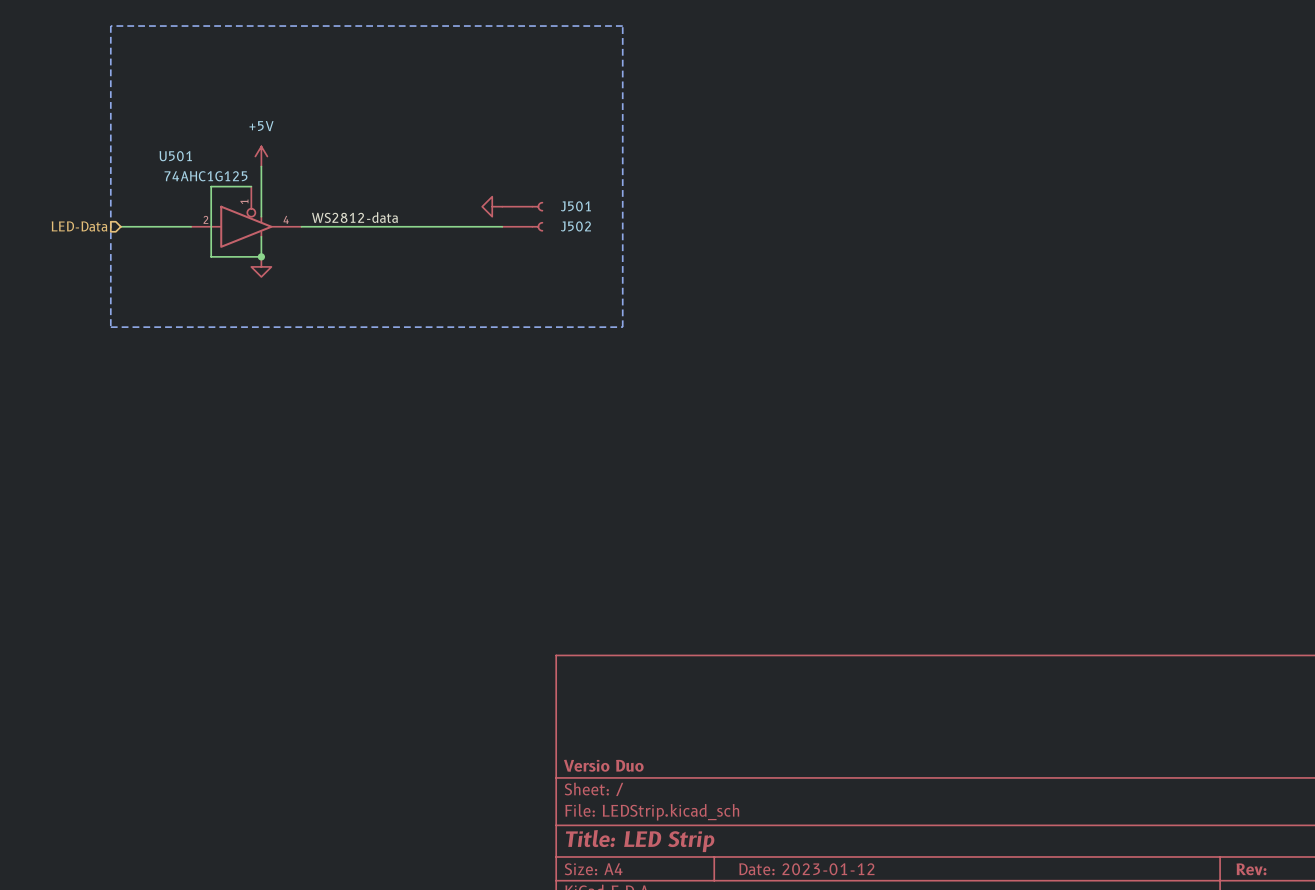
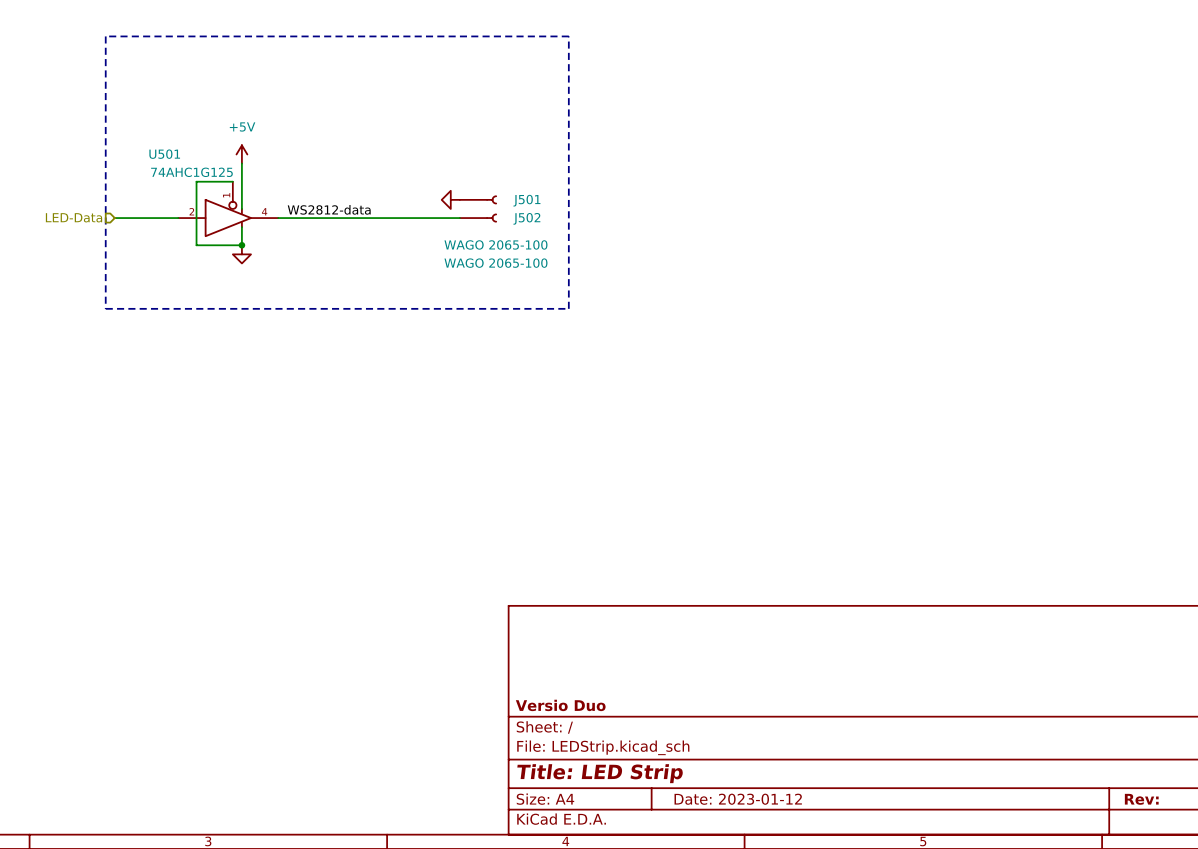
J501 value: none -> WAGO 2065-100 (495, 244)
J502 value: none -> WAGO 2065-100 (495, 263)

